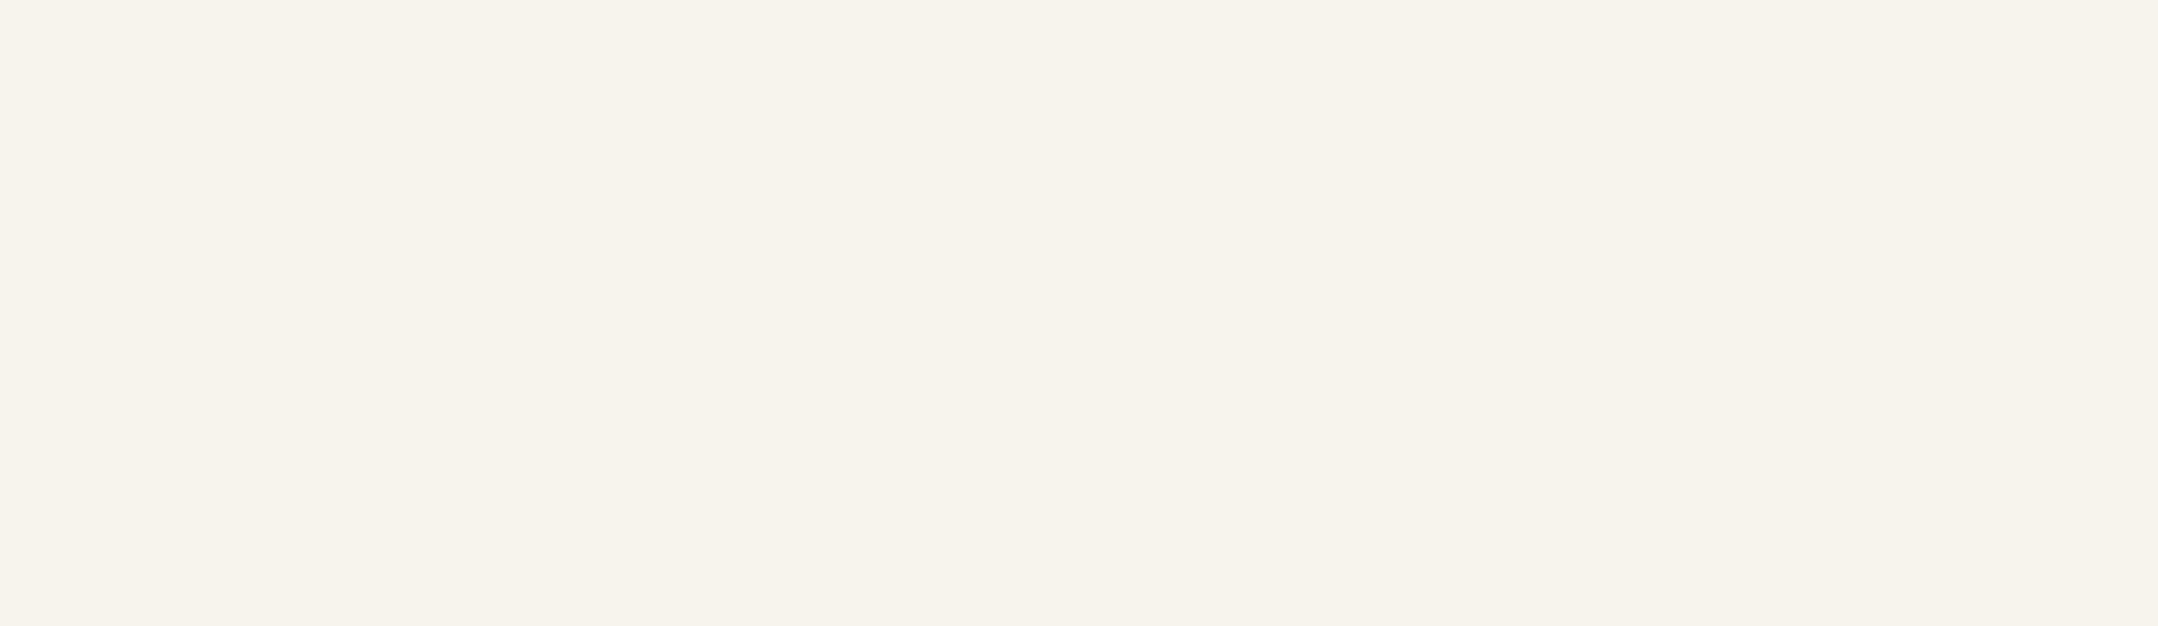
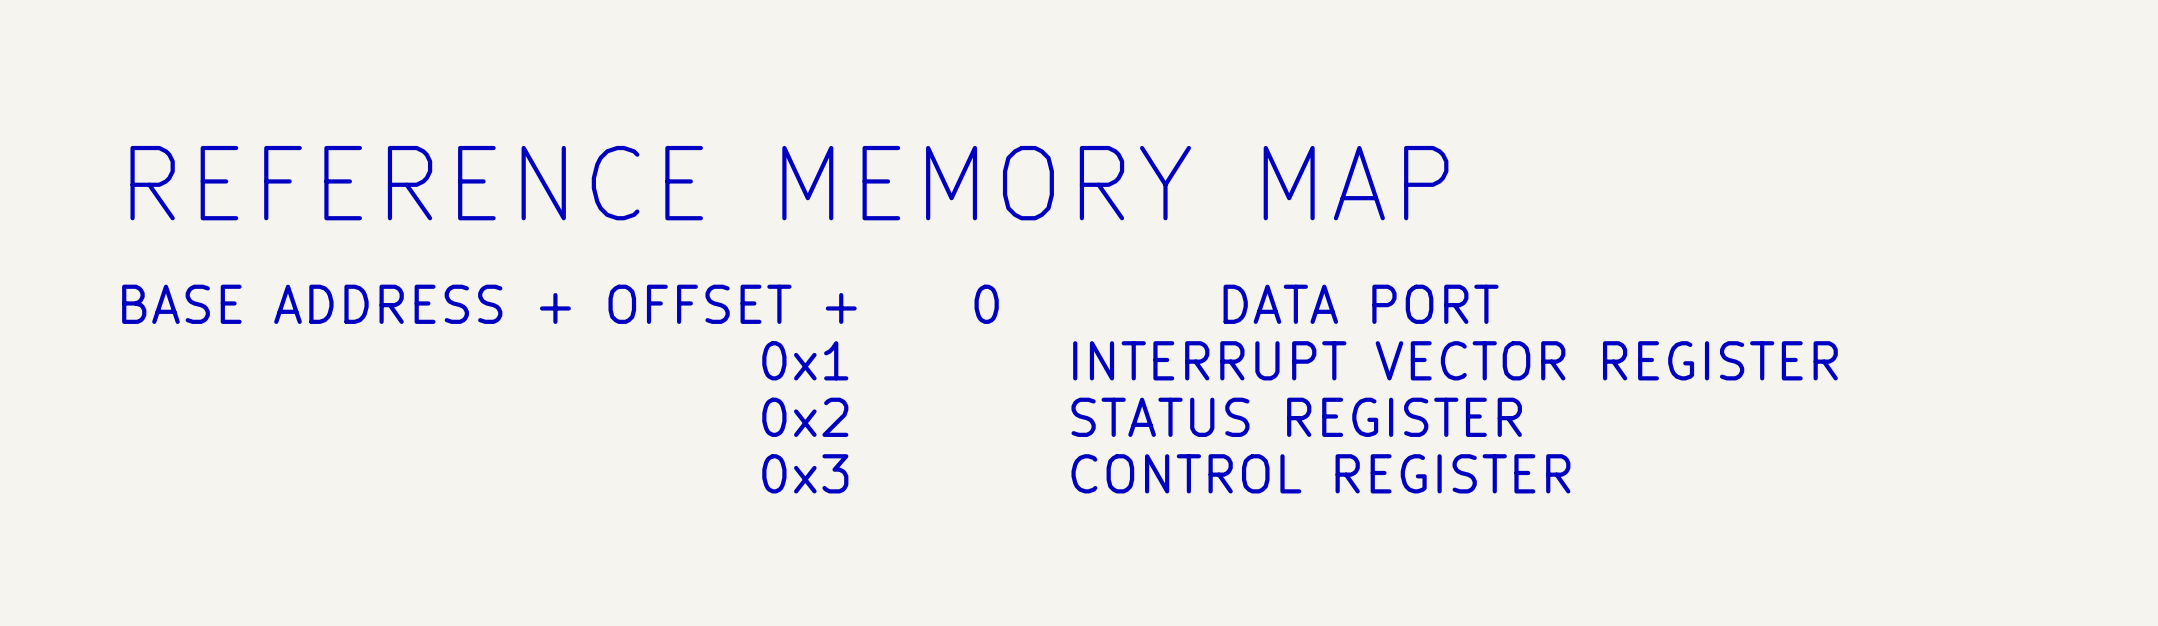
text: none -> REFERENCE MEMORY MAP (789, 183)
text: none -> BASE ADDRESS + OFFSET + 0 DATA PORT (810, 304)
text: none -> 0x1 INTERRUPT VECTOR REGISTER (1300, 360)
text: none -> 0x2 STATUS REGISTER (1142, 417)
text: none -> 0x3 CONTROL REGISTER (1166, 473)

